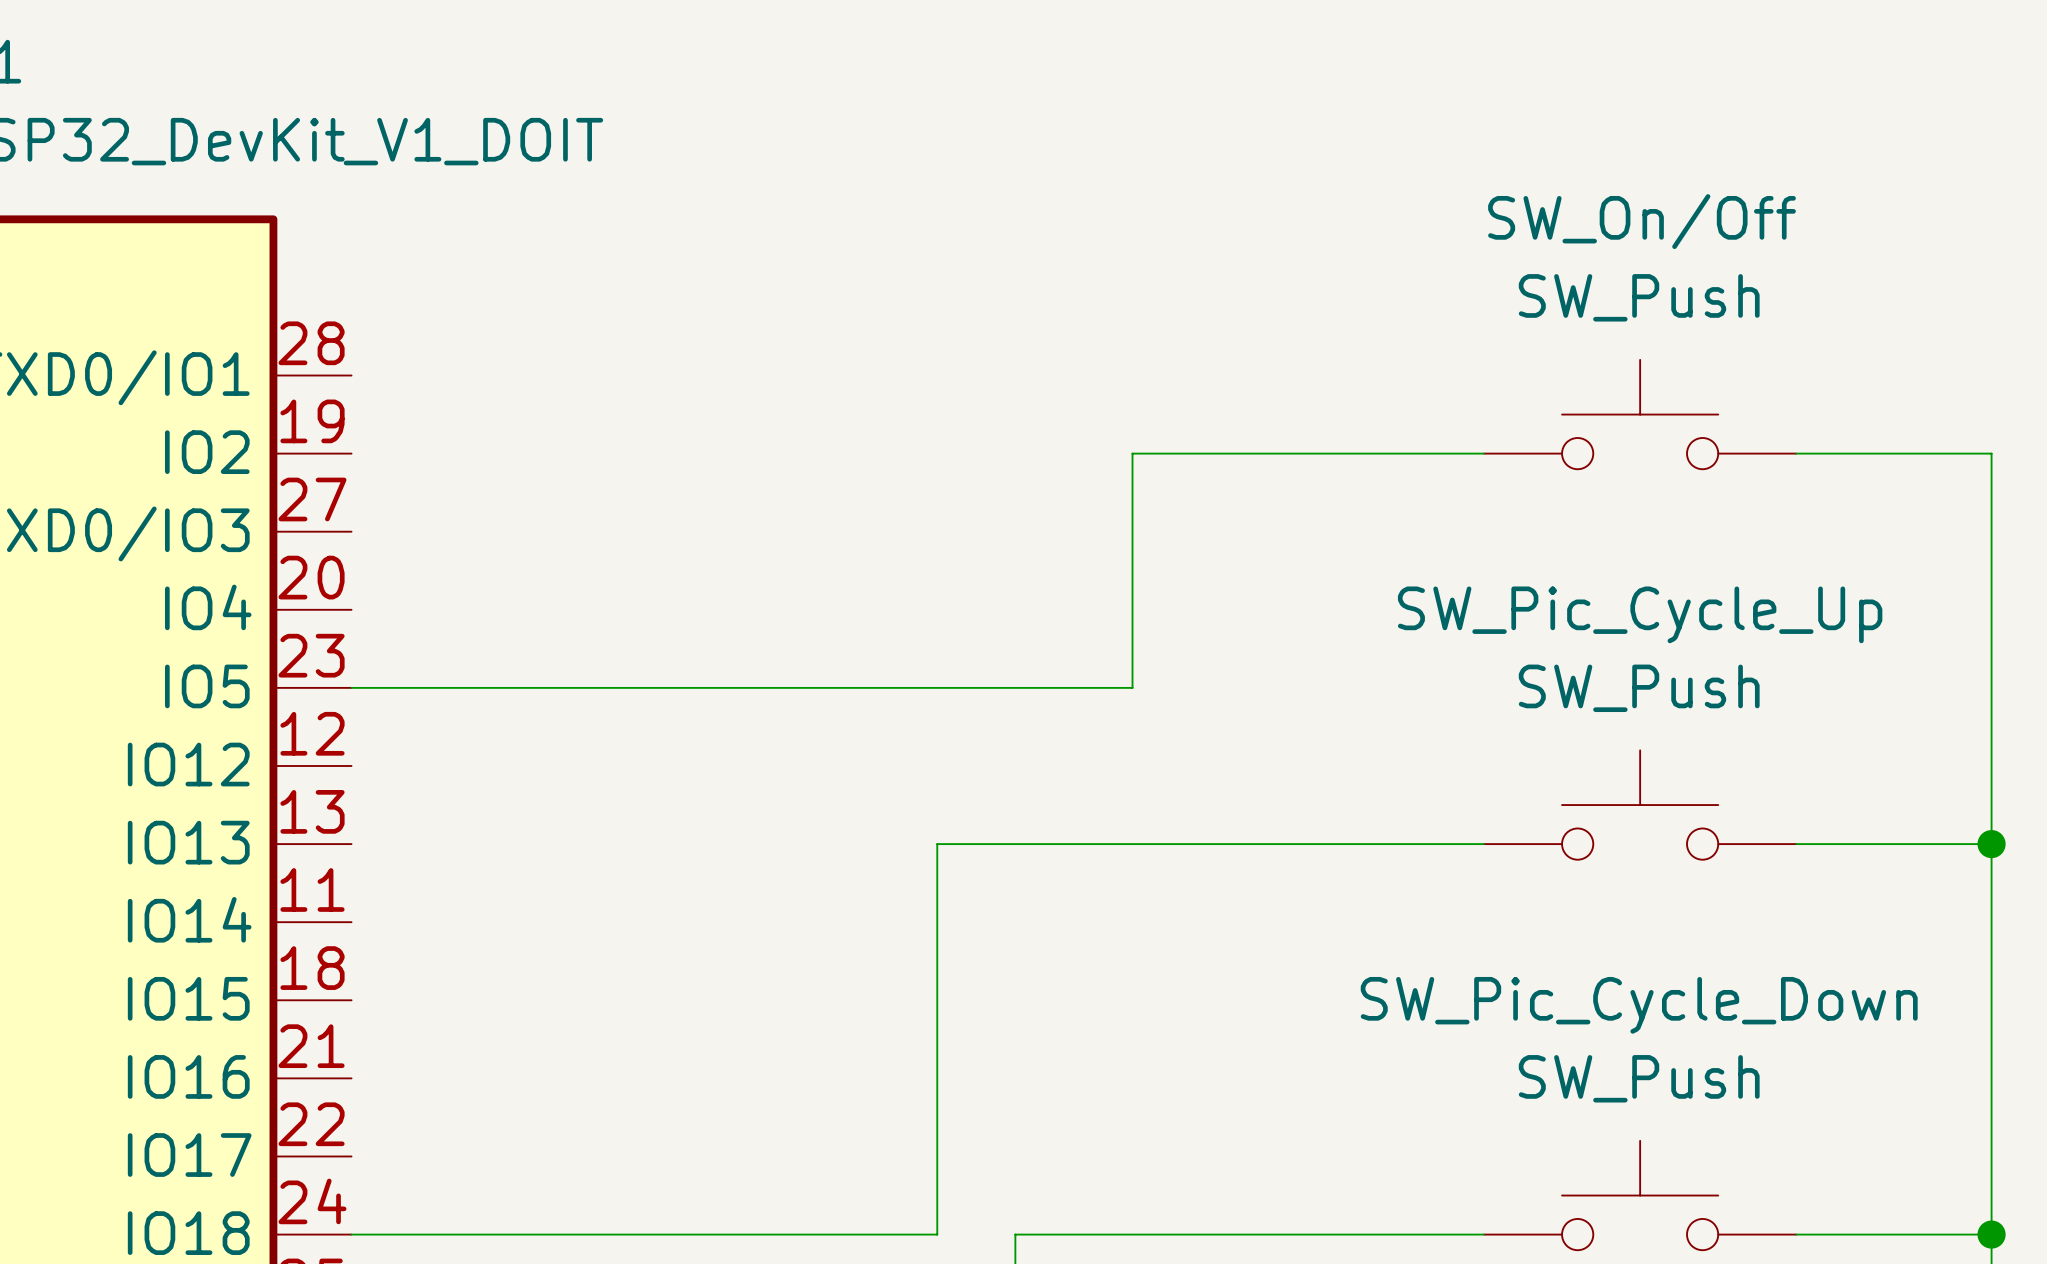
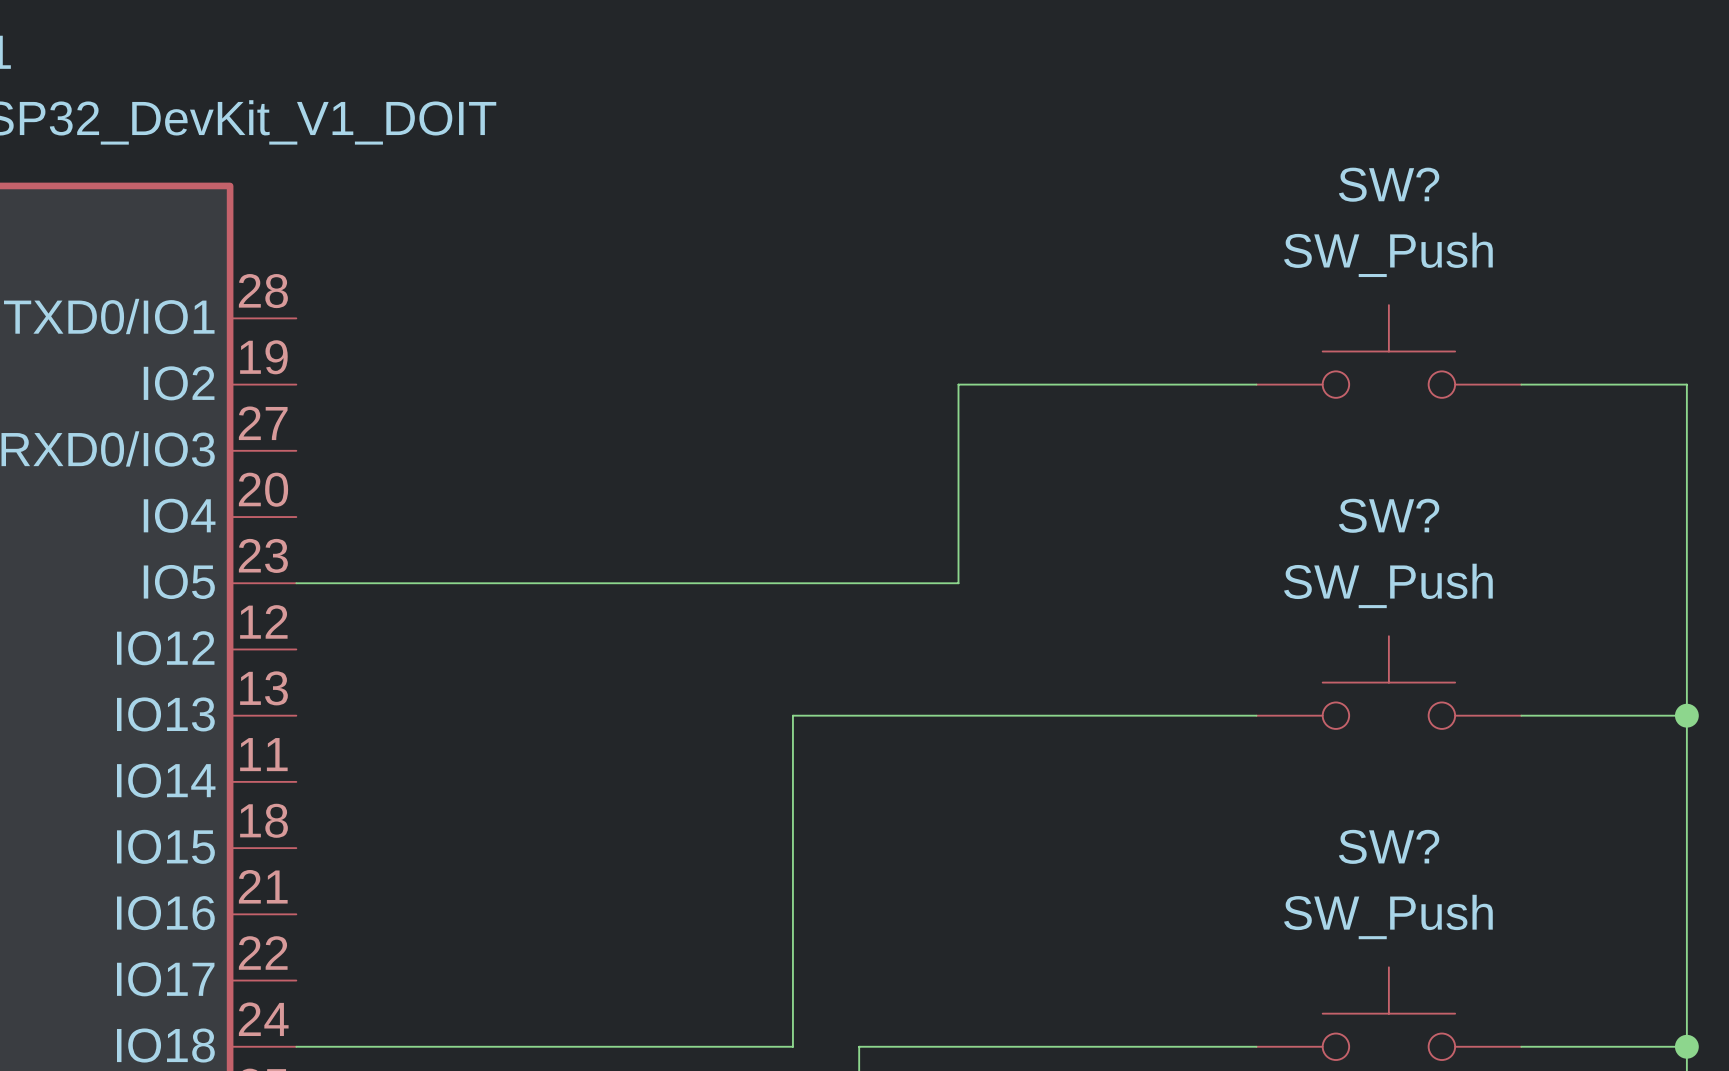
SW_On/Off name: SW_On/Off (1642, 221) -> SW? (1389, 184)
SW_Pic_Cycle_Up name: SW_Pic_Cycle_Up (1640, 614) -> SW? (1389, 515)
SW_Pic_Cycle_Down name: SW_Pic_Cycle_Down (1639, 1005) -> SW? (1389, 846)

